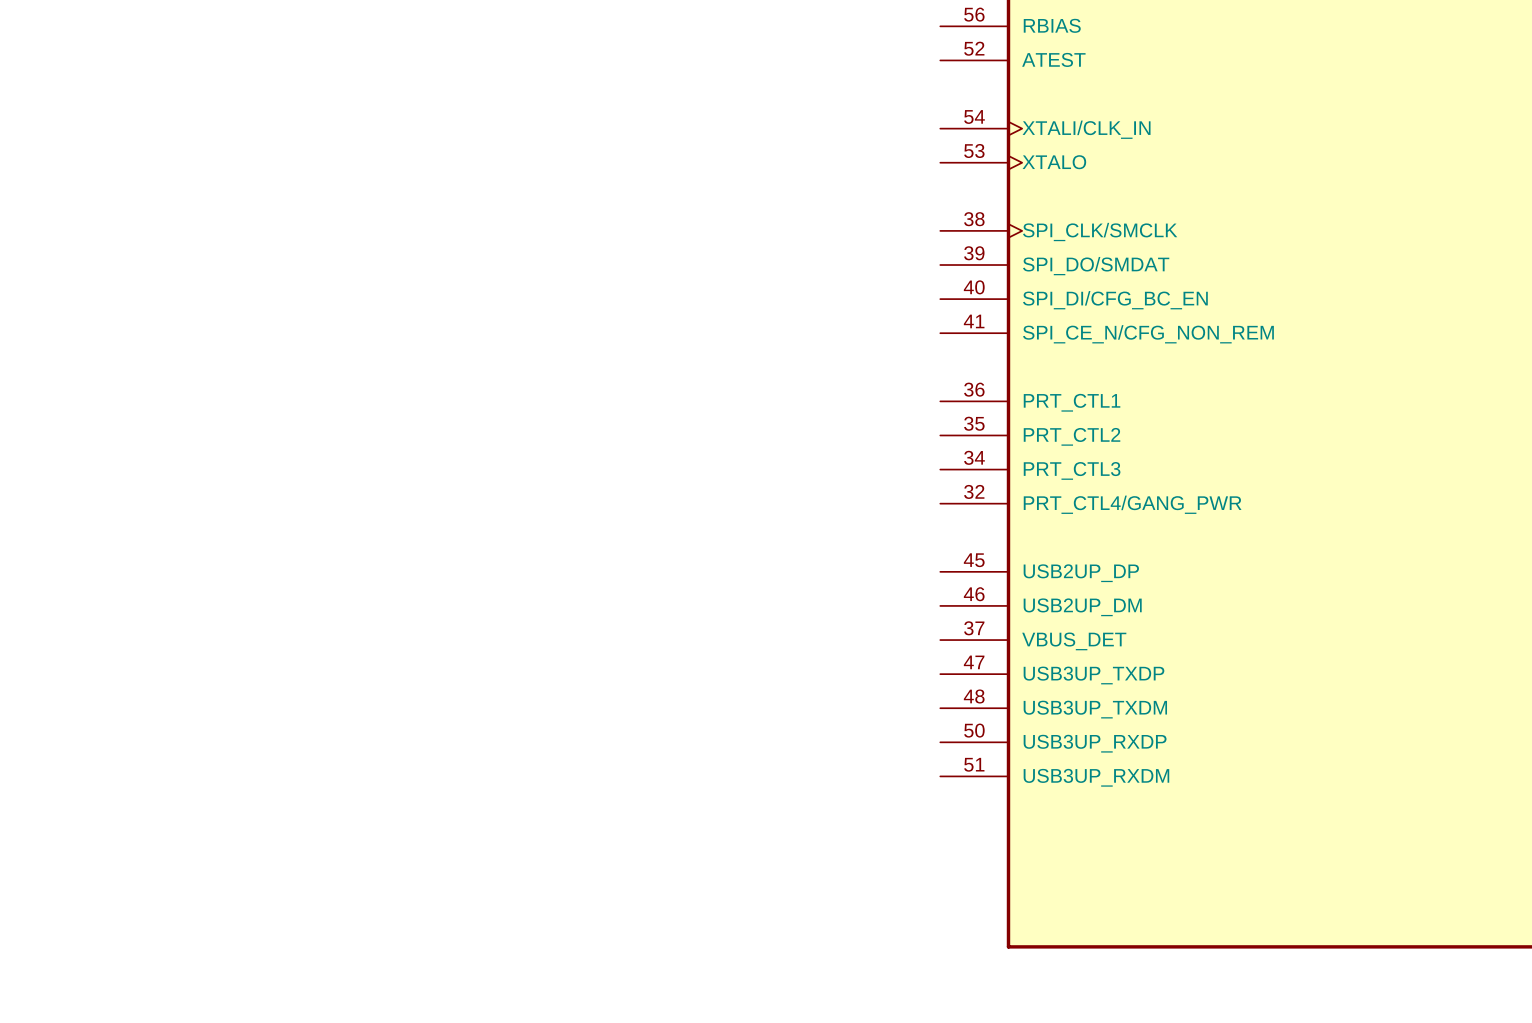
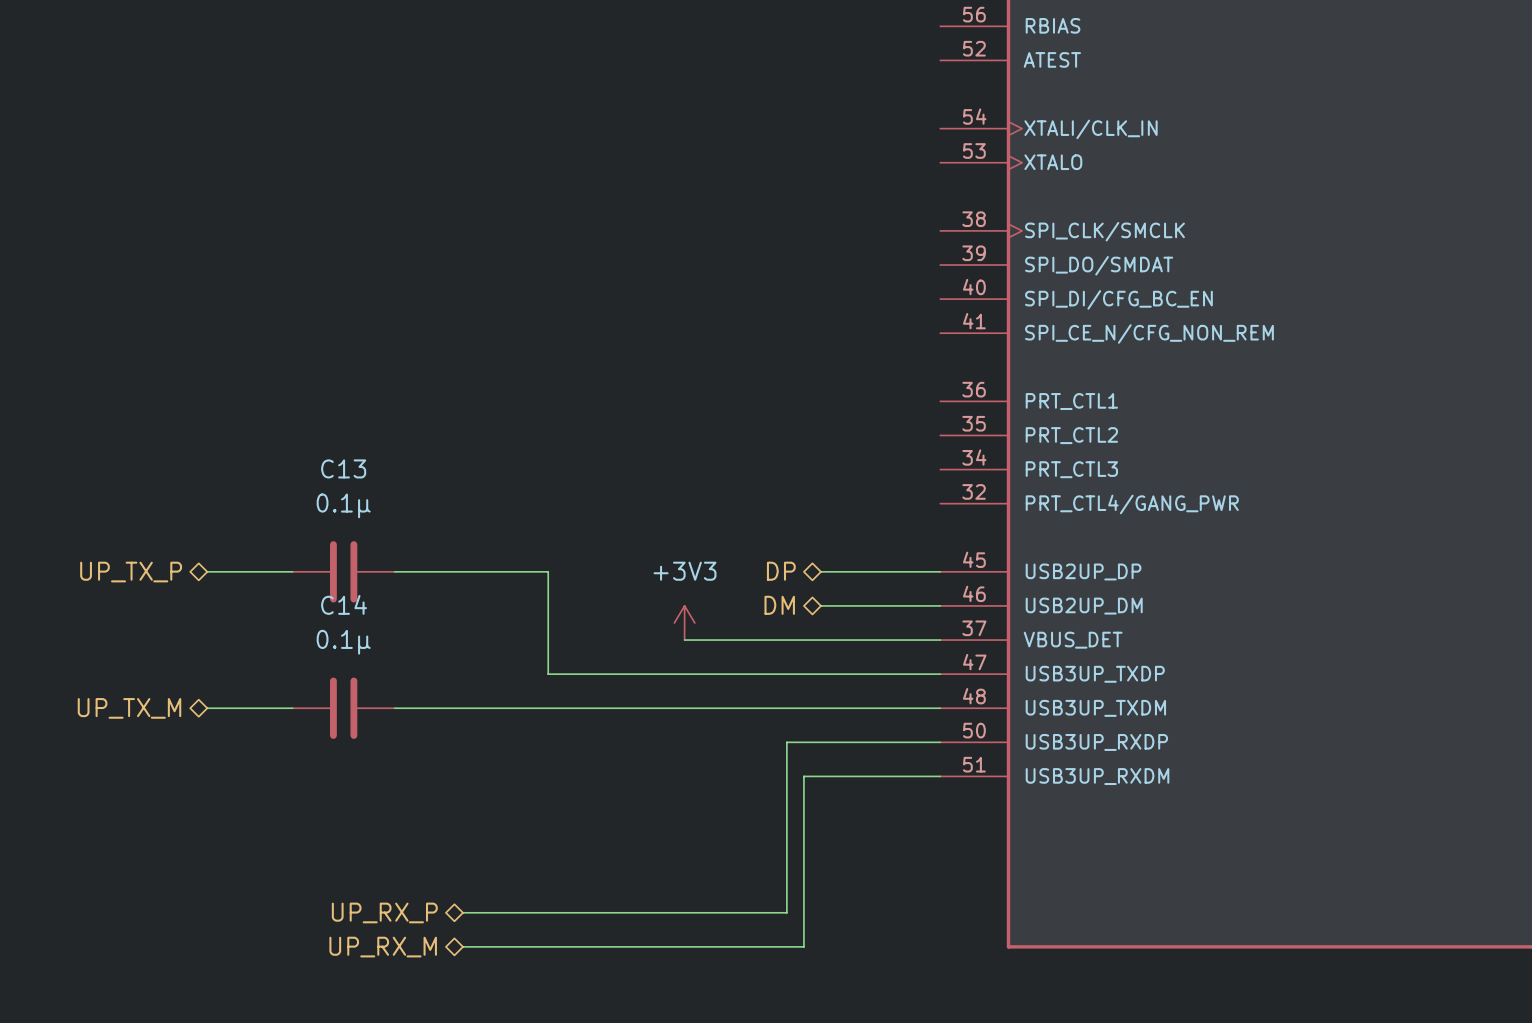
wire: none -> (207, 571) (292, 571)
C13: none -> 0.1µ (343, 571)
wire: none -> (394, 571) (548, 571) (548, 674) (940, 674)
hierarchical label: none -> DP (781, 571)
wire: none -> (820, 571) (940, 571)
hierarchical label: none -> UP_TX_P (131, 572)
hierarchical label: none -> DM (779, 605)
wire: none -> (820, 605) (940, 605)
power symbol: none -> +3V3 (684, 622)
wire: none -> (684, 640) (940, 640)
wire: none -> (207, 708) (292, 708)
C14: none -> 0.1µ (343, 708)
wire: none -> (394, 708) (940, 708)
hierarchical label: none -> UP_TX_M (129, 708)
wire: none -> (940, 742) (786, 742) (786, 912) (462, 912)
wire: none -> (940, 776) (803, 776) (803, 946) (462, 946)
hierarchical label: none -> UP_RX_P (384, 912)
hierarchical label: none -> UP_RX_M (383, 947)

